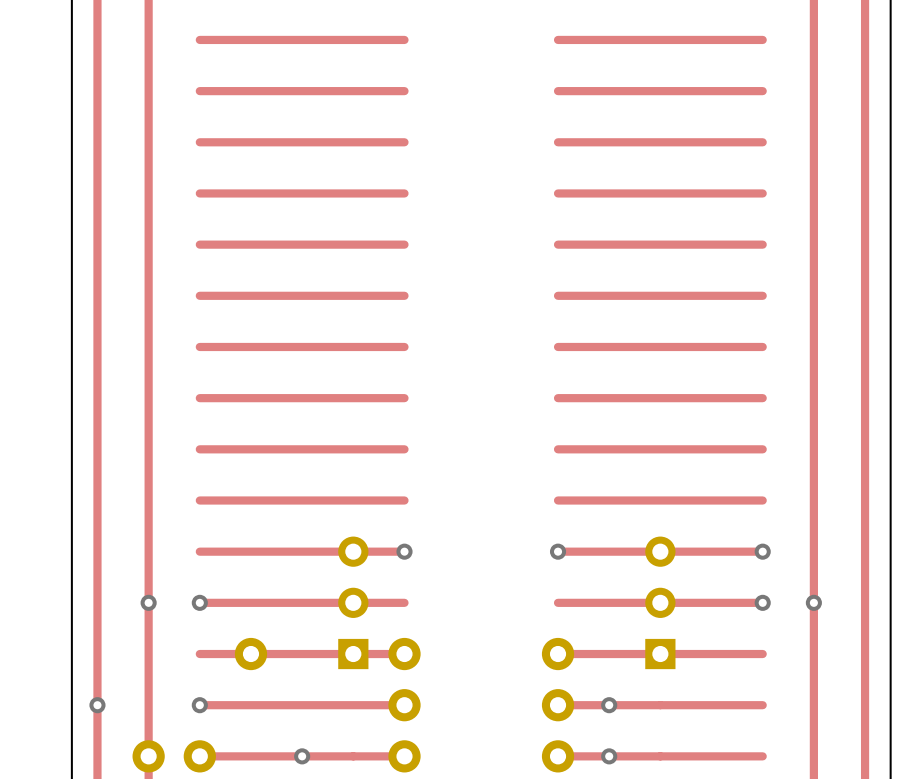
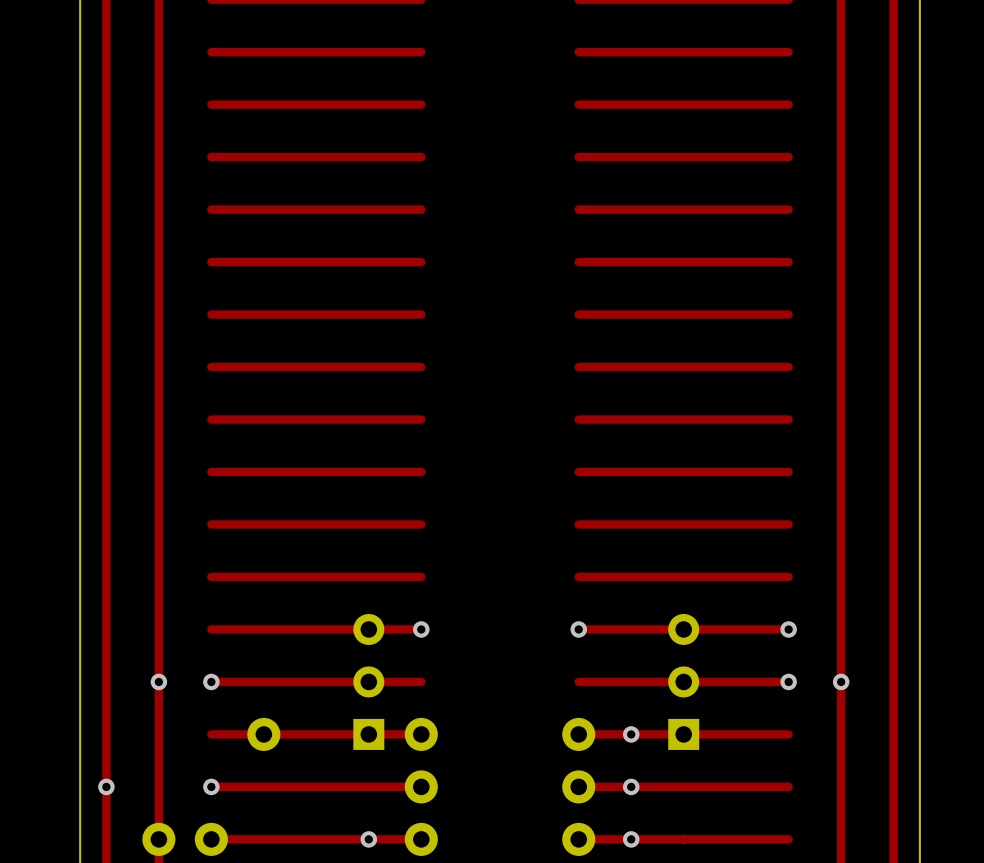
via: none -> (631, 734)
via: (302, 756) -> none
via: none -> (368, 839)

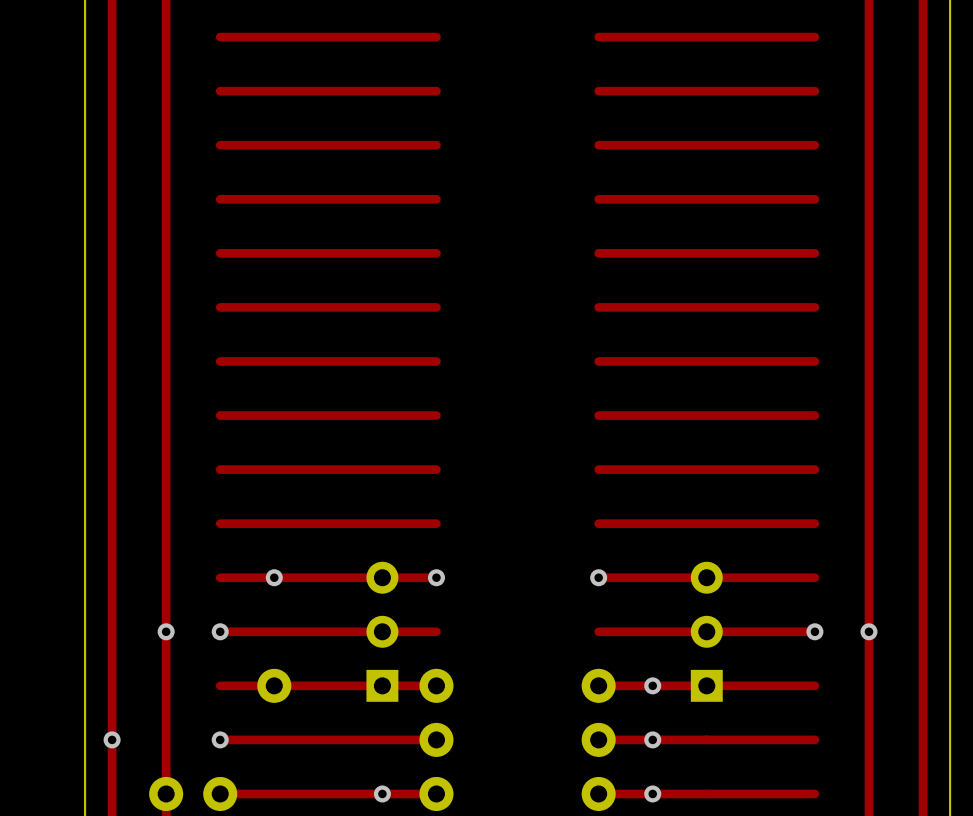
via: none -> (274, 577)
via: (788, 629) -> none

